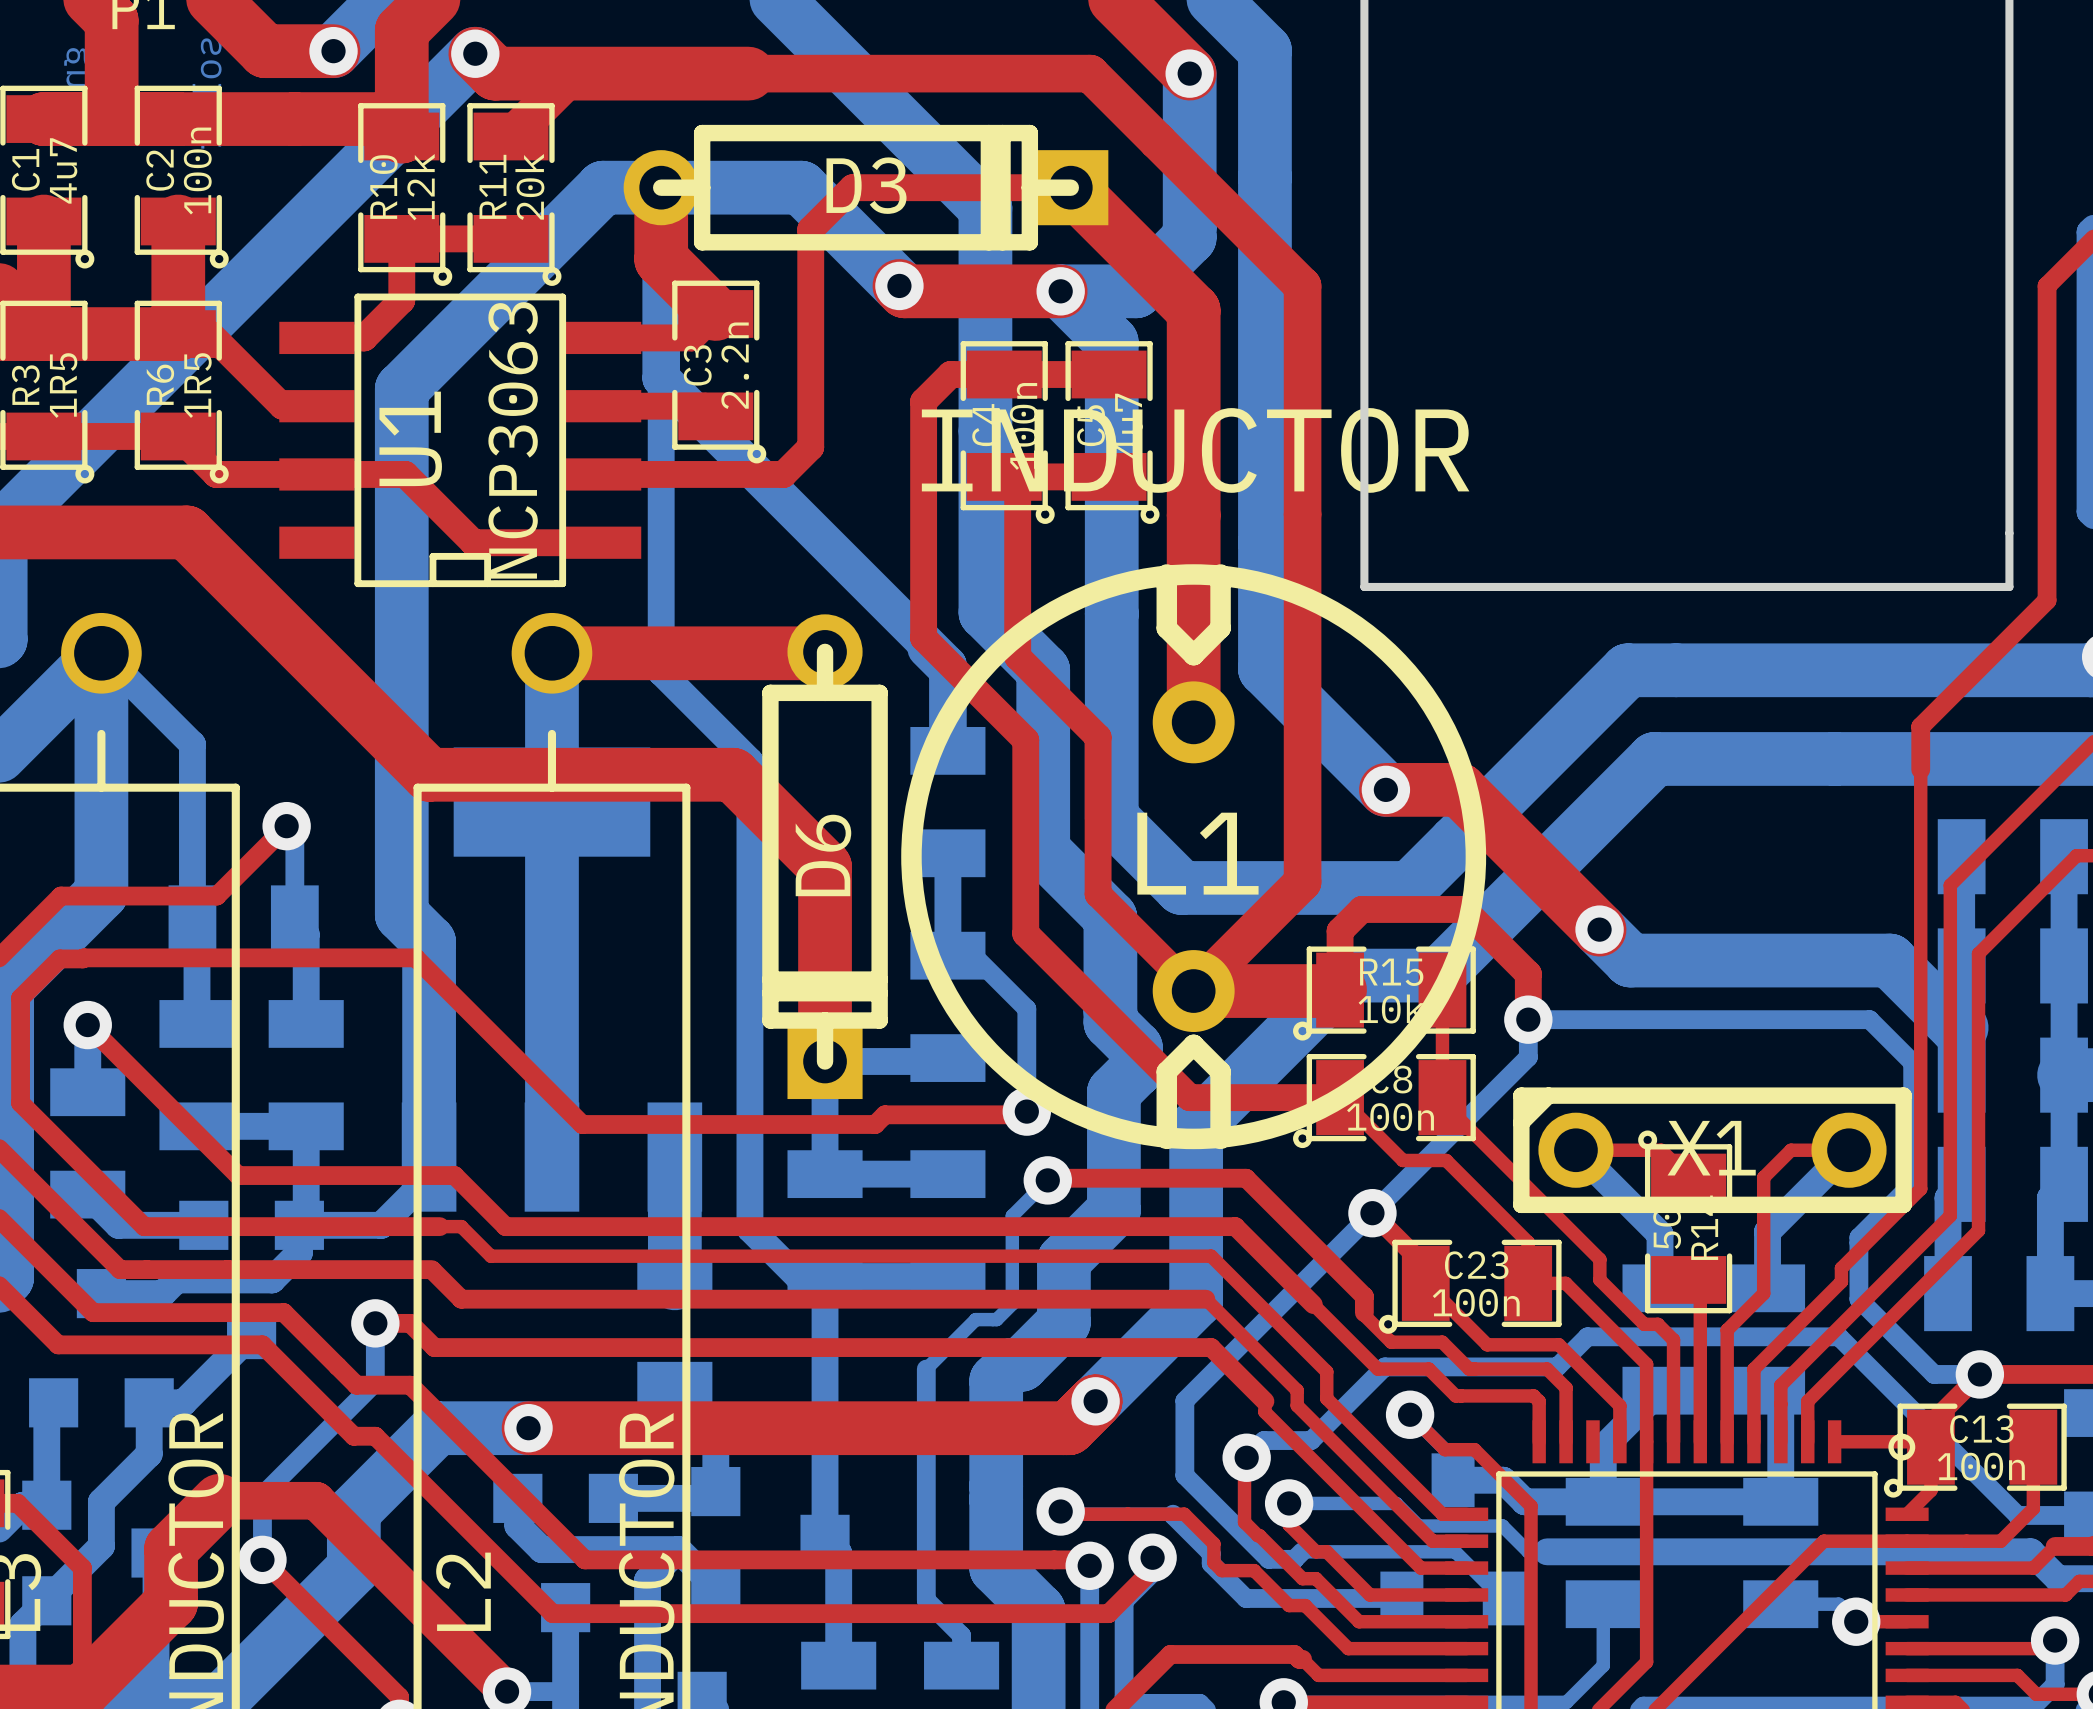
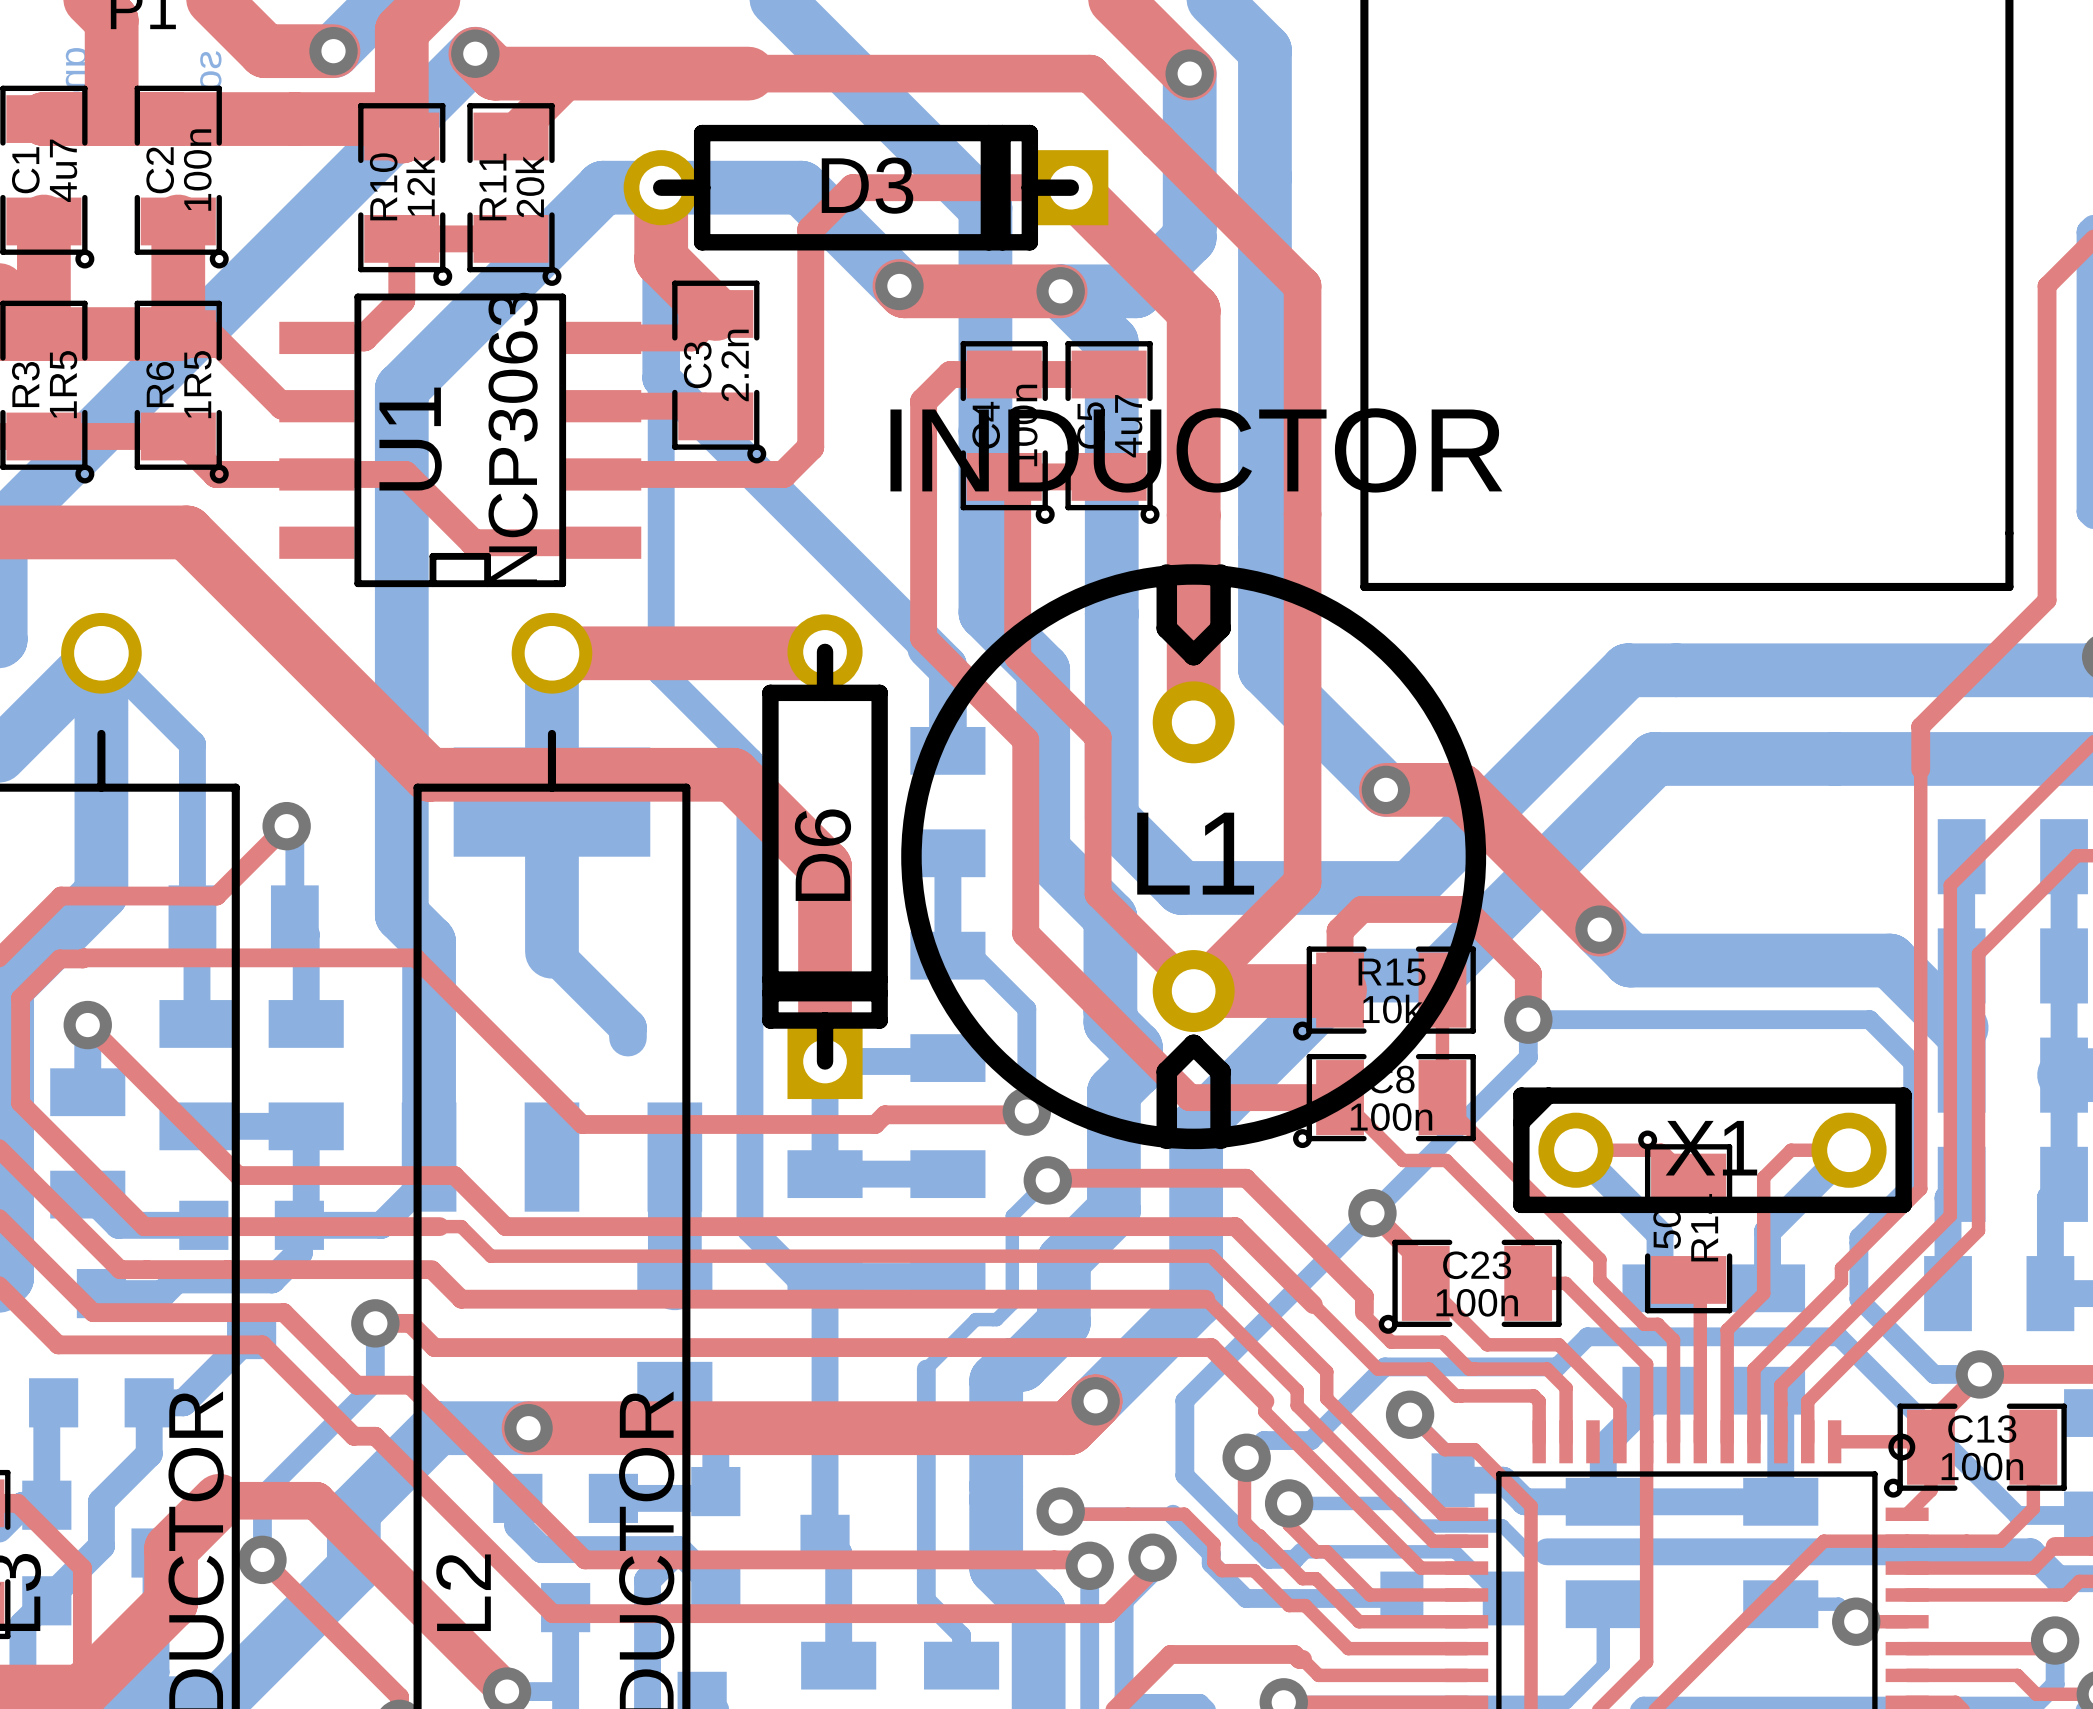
bottom track: (551, 951) (551, 1157) -> (551, 951) (627, 1027) (627, 1037)

